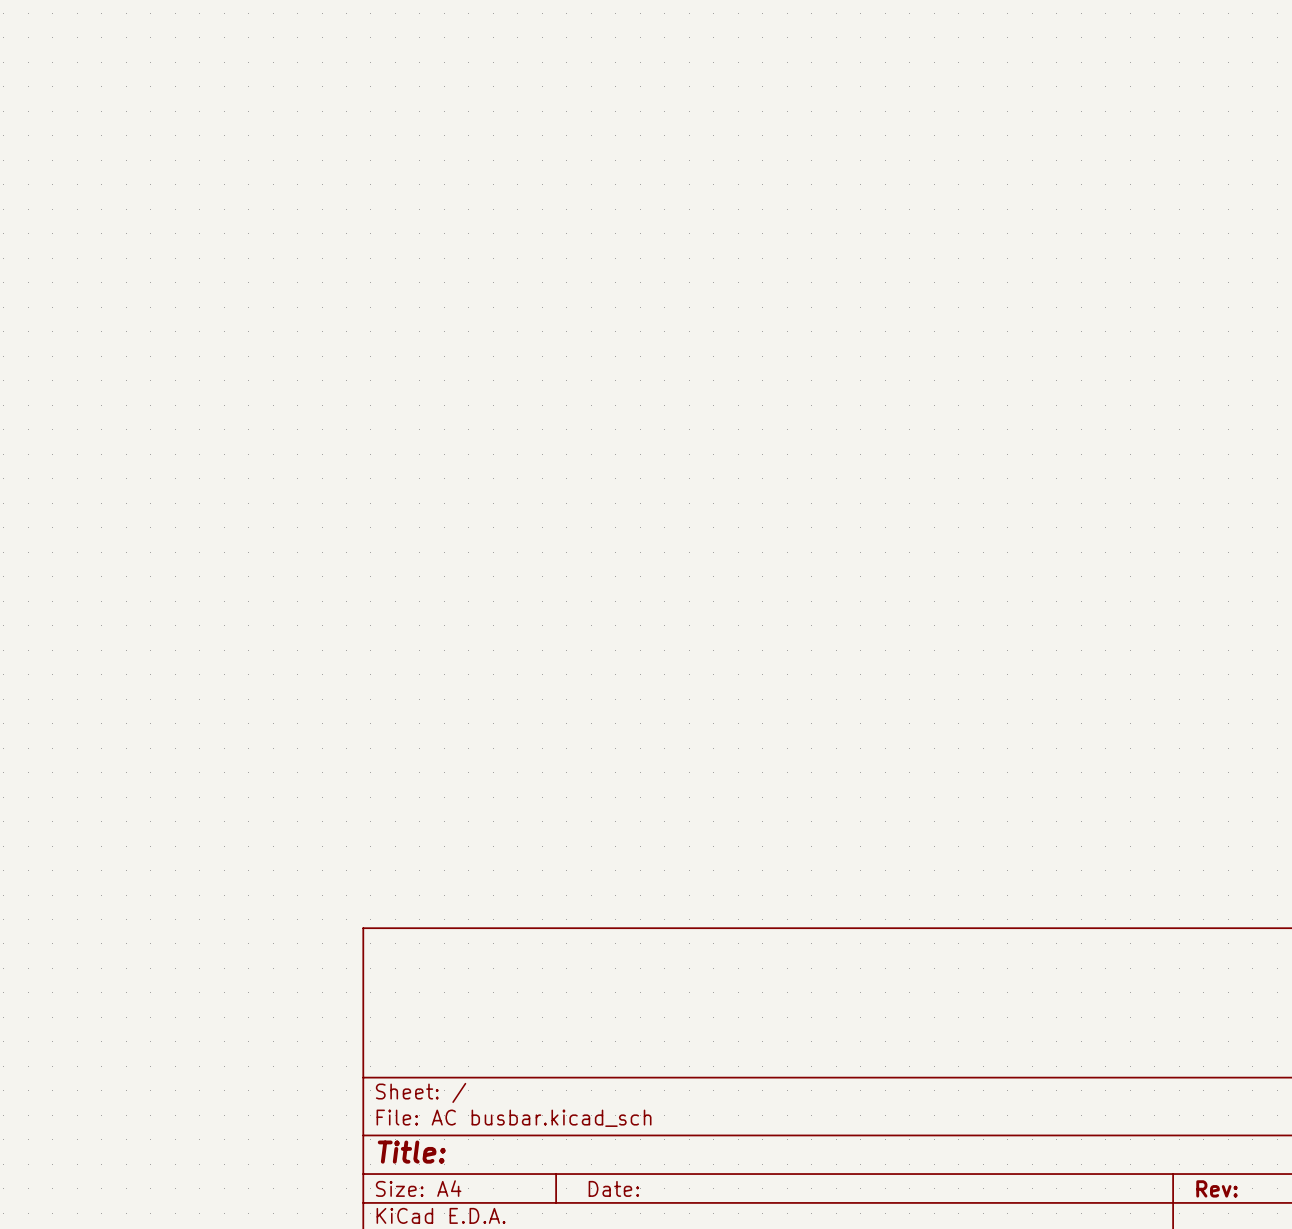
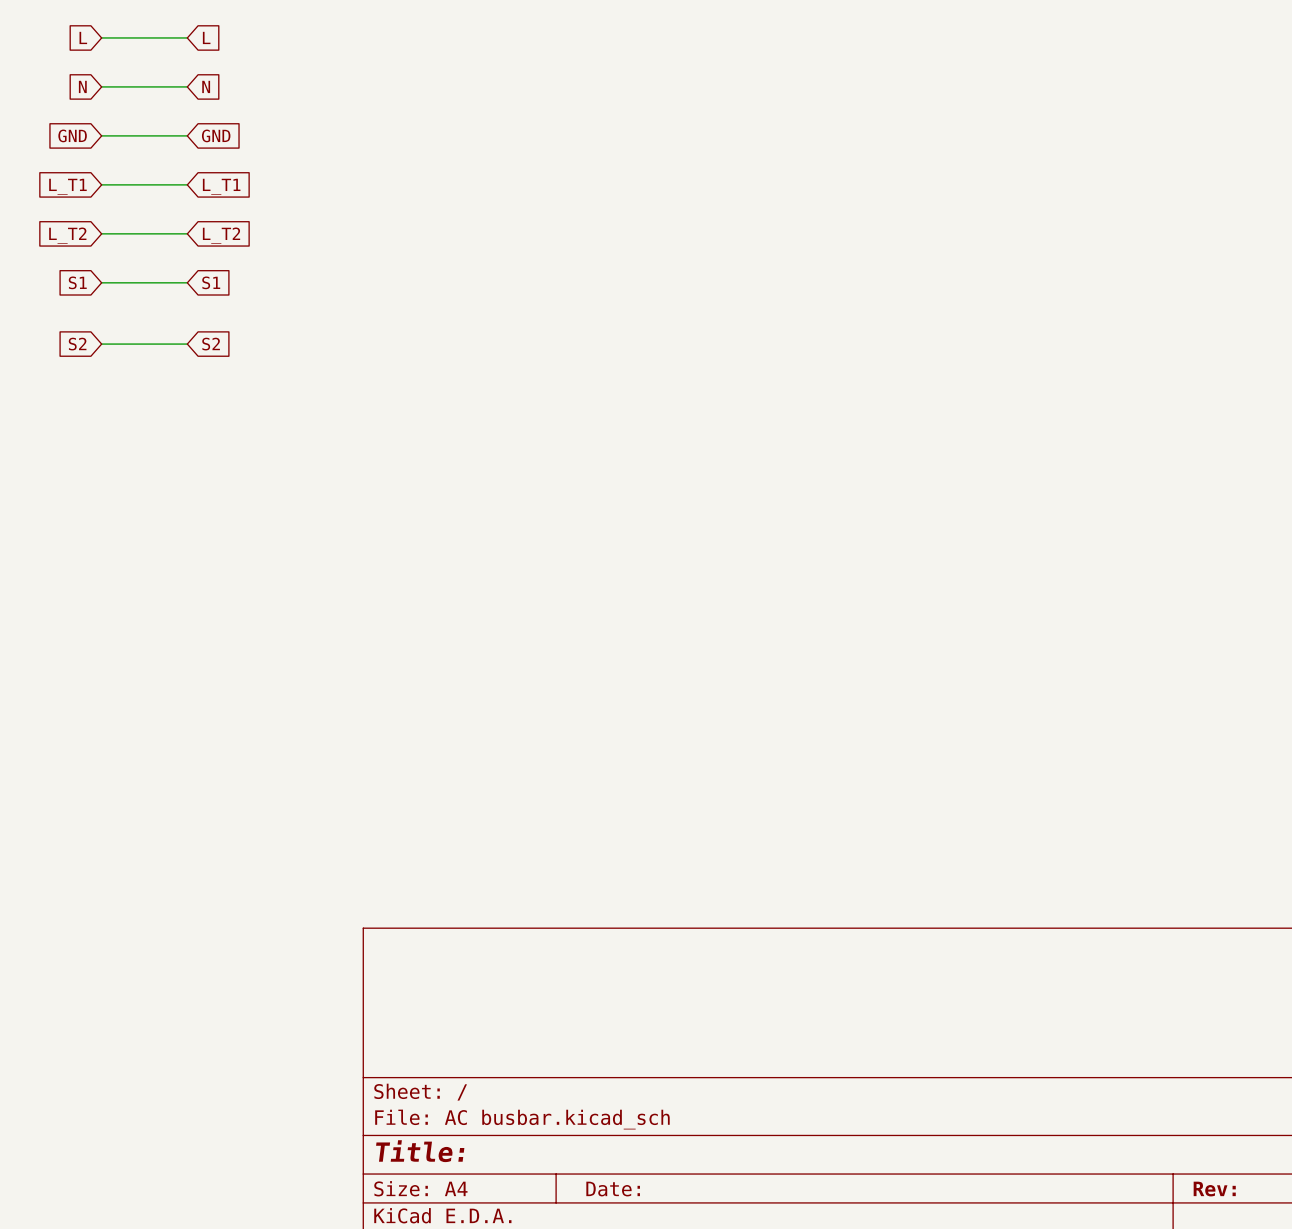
global label: none -> L (83, 37)
wire: none -> (101, 37) (187, 37)
global label: none -> L (206, 37)
global label: none -> N (82, 86)
wire: none -> (101, 86) (187, 86)
global label: none -> N (206, 86)
global label: none -> GND (72, 135)
wire: none -> (101, 135) (187, 135)
global label: none -> GND (216, 135)
wire: none -> (101, 184) (187, 184)
global label: none -> L_T1 (67, 186)
global label: none -> L_T1 (221, 186)
wire: none -> (101, 233) (187, 233)
global label: none -> L_T2 (67, 235)
global label: none -> L_T2 (221, 235)
global label: none -> S1 (77, 282)
wire: none -> (101, 282) (187, 282)
global label: none -> S1 (211, 282)
global label: none -> S2 (77, 344)
wire: none -> (101, 344) (187, 344)
global label: none -> S2 (211, 344)

